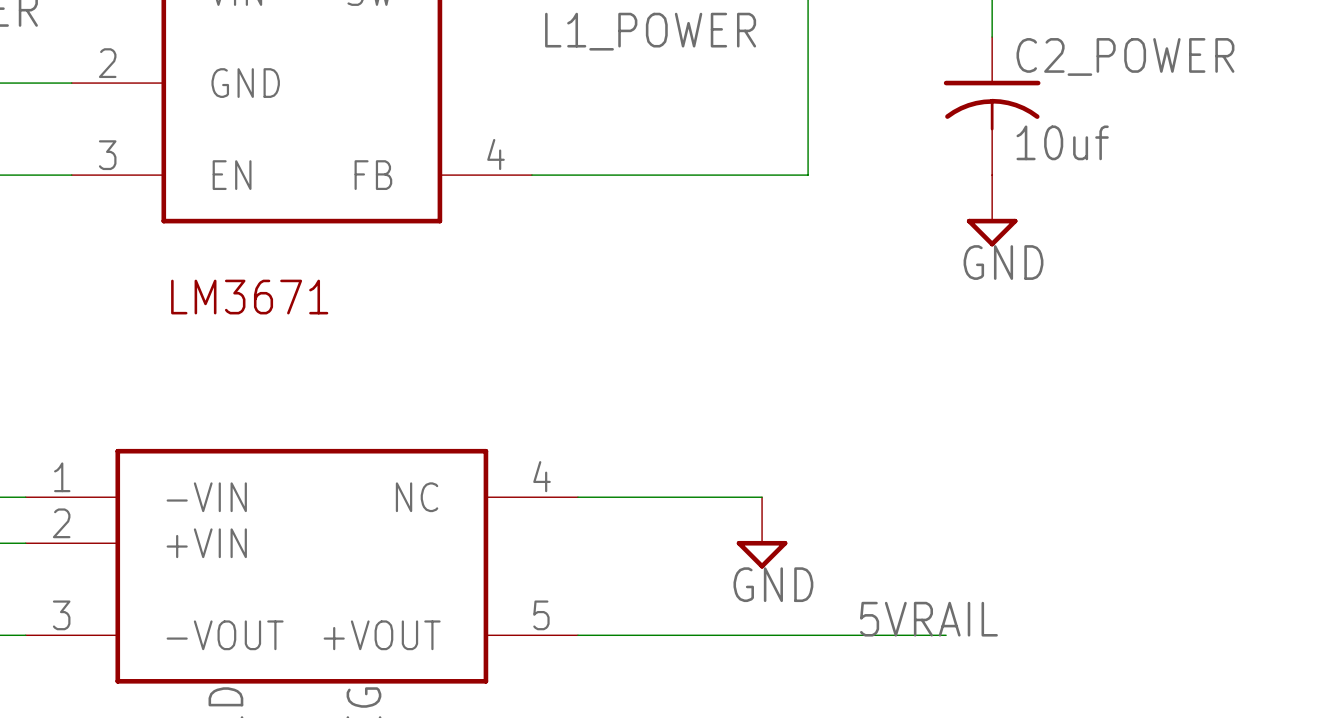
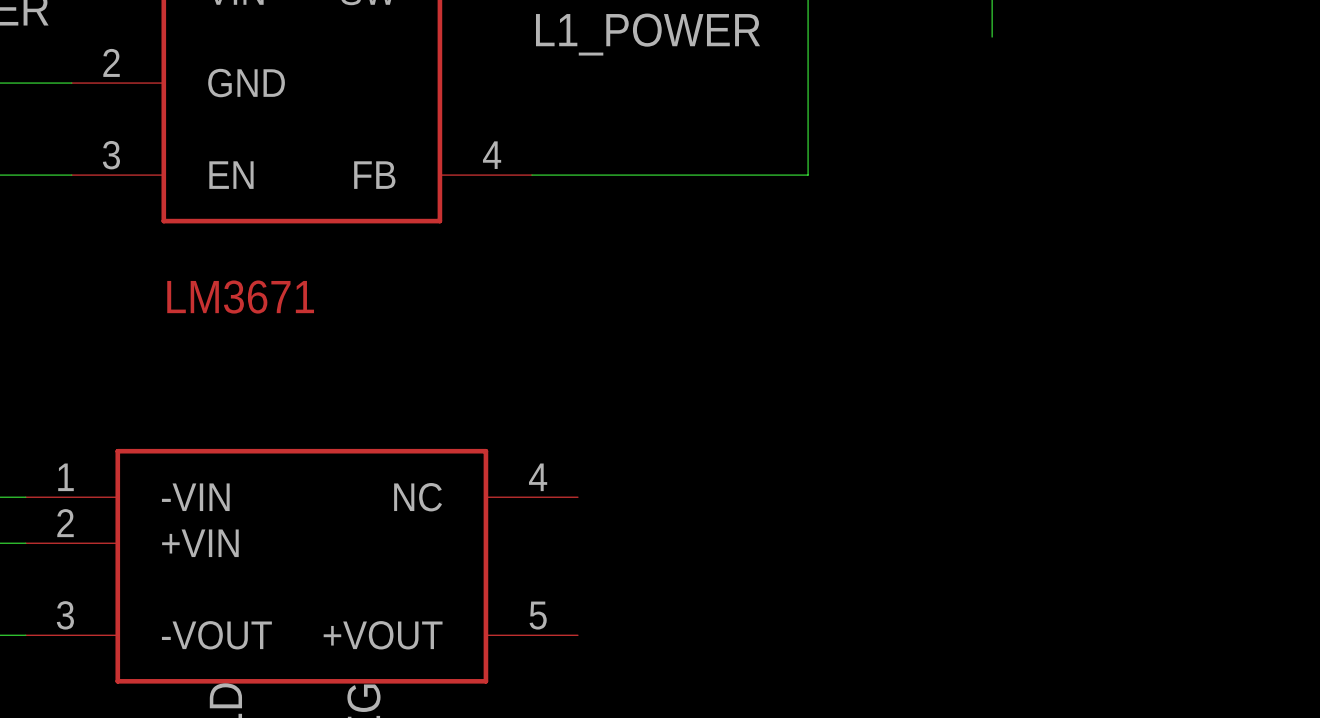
C2_POWER: 10uf (992, 106) -> none
power symbol: GND (992, 210) -> none
wire: (577, 497) (762, 497) -> none
power symbol: GND (762, 532) -> none
label: 5VRAIL (928, 619) -> none
wire: (577, 635) (946, 635) -> none

